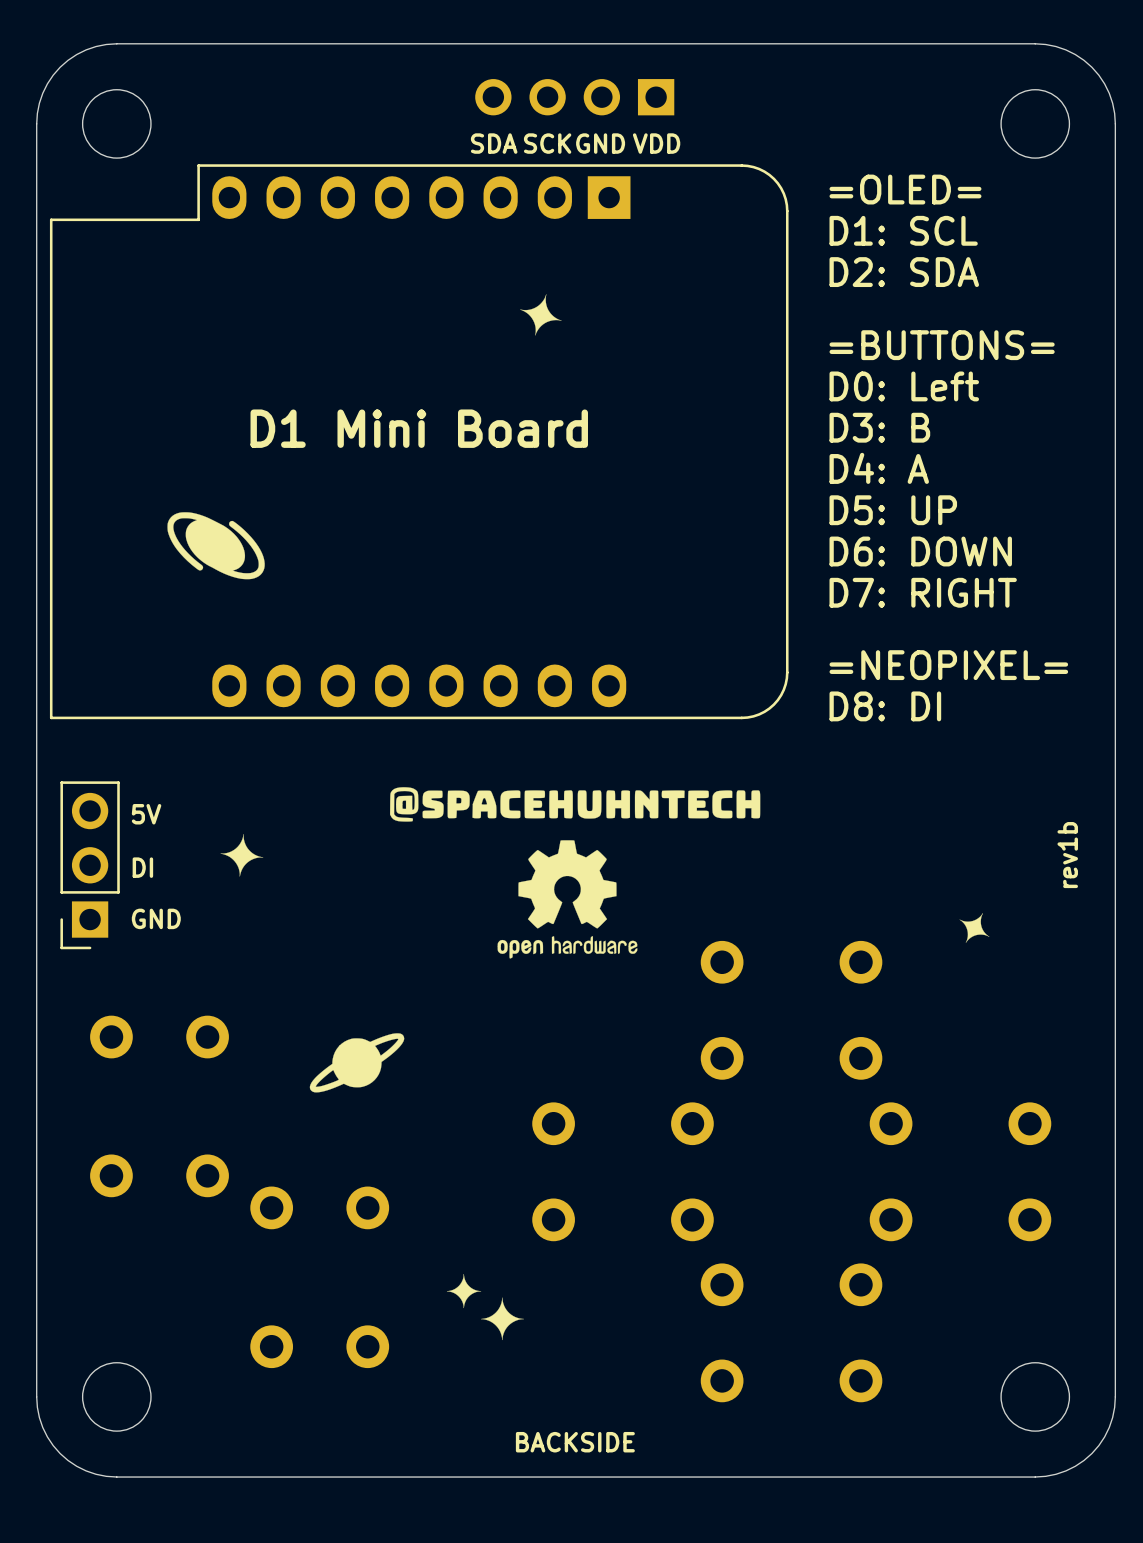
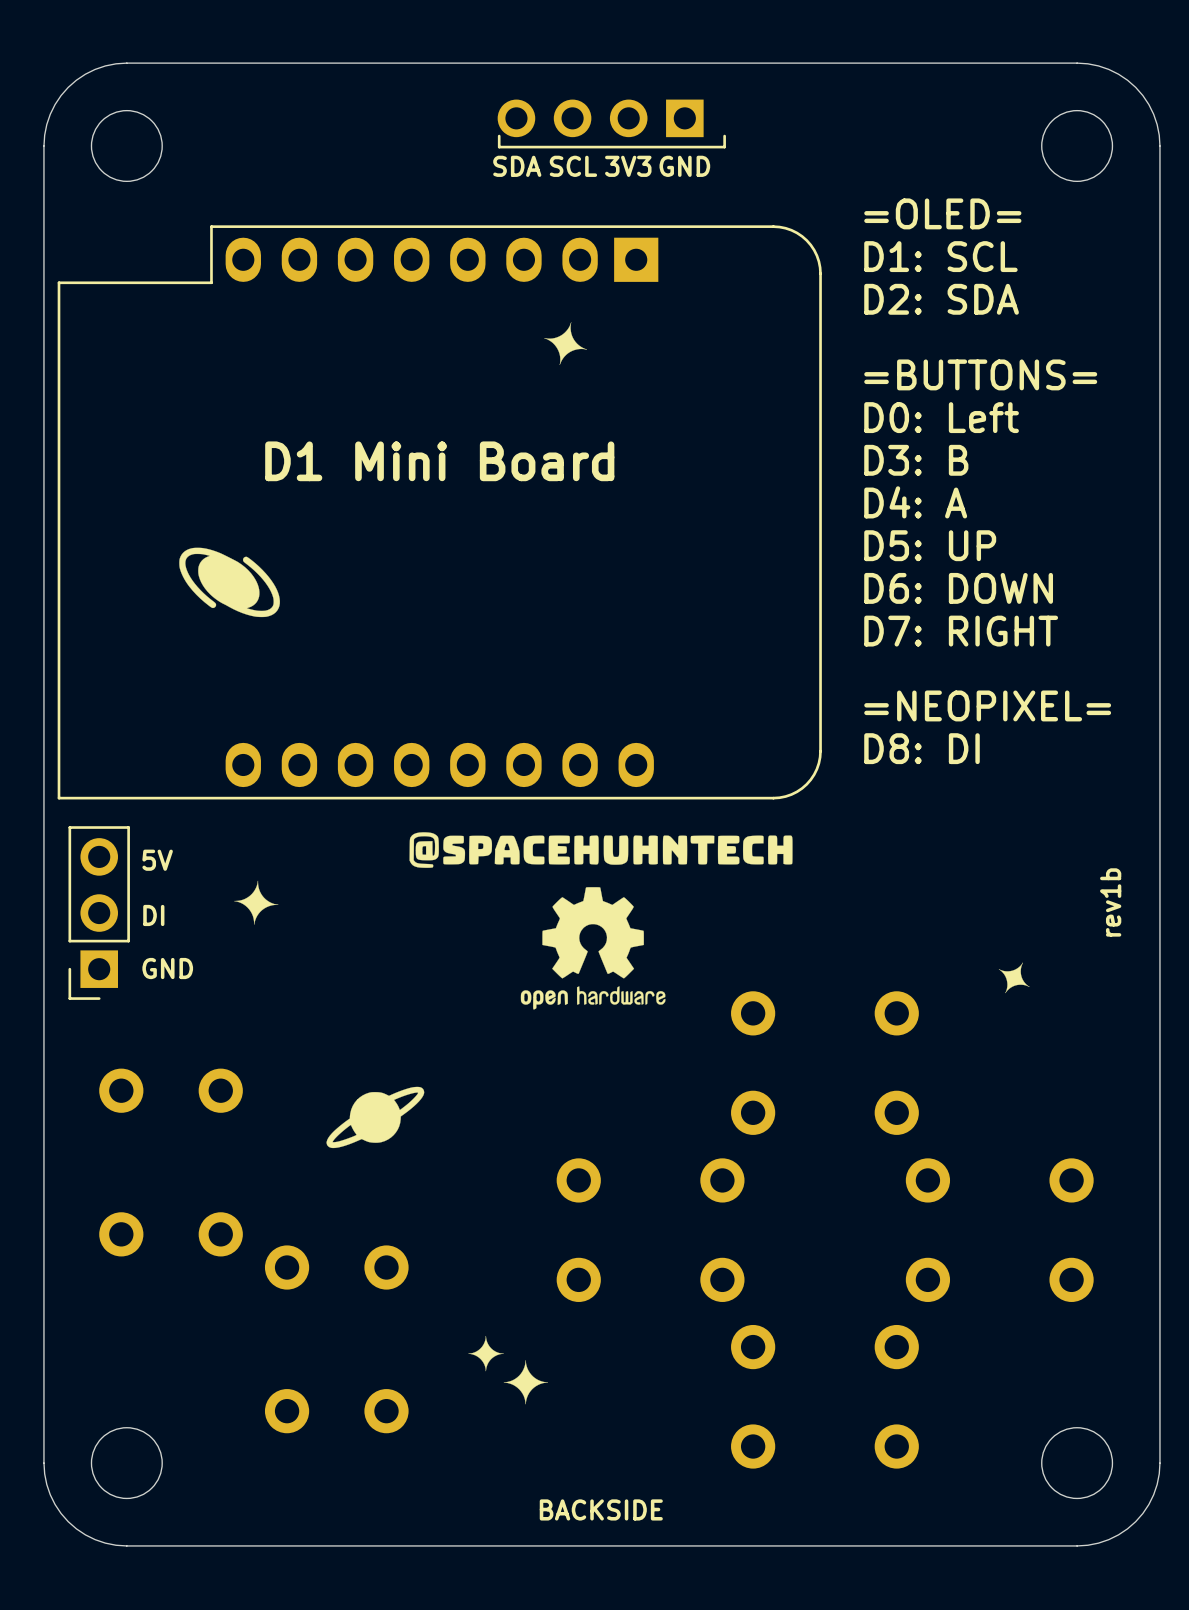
line: none -> (724, 136) (724, 147) (499, 147) (499, 136)
text: SCK (547, 143) -> SCL (573, 166)
text: GND (600, 143) -> 3V3 (628, 166)
text: VDD (656, 143) -> GND (684, 166)
part position: (419, 441) -> (439, 512)

